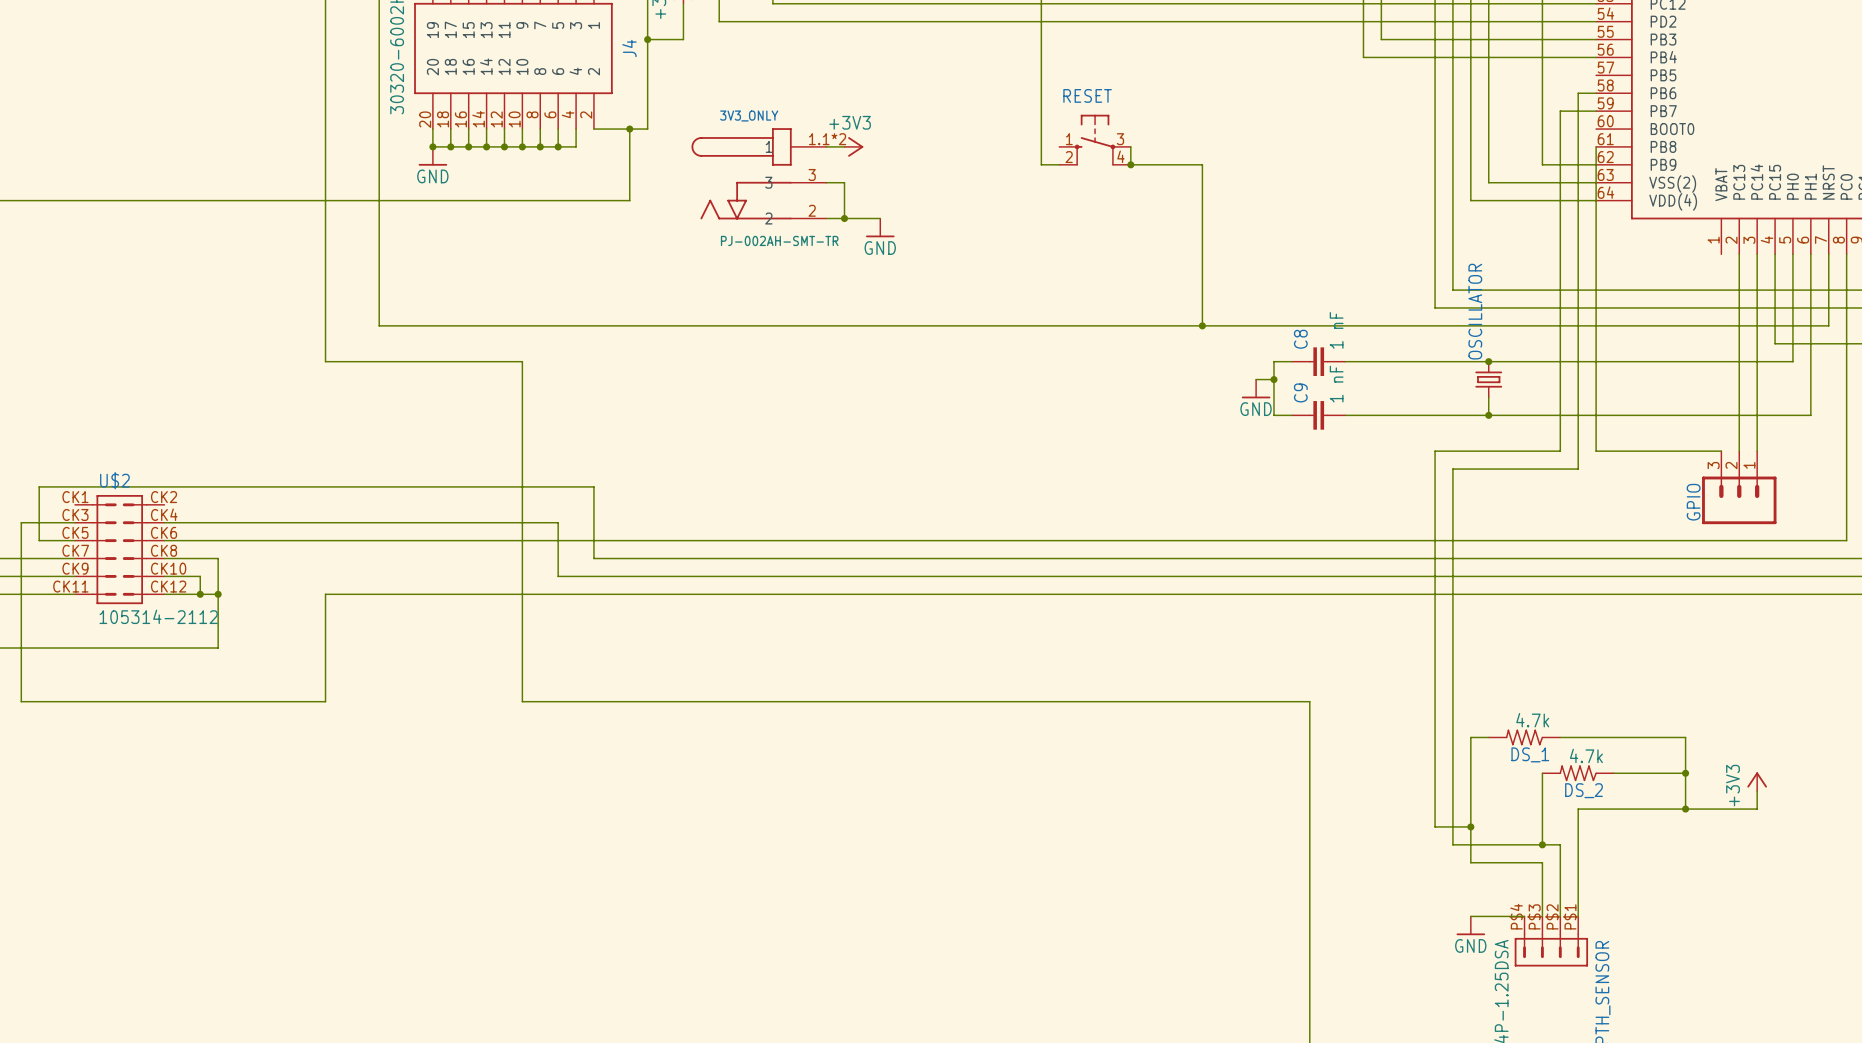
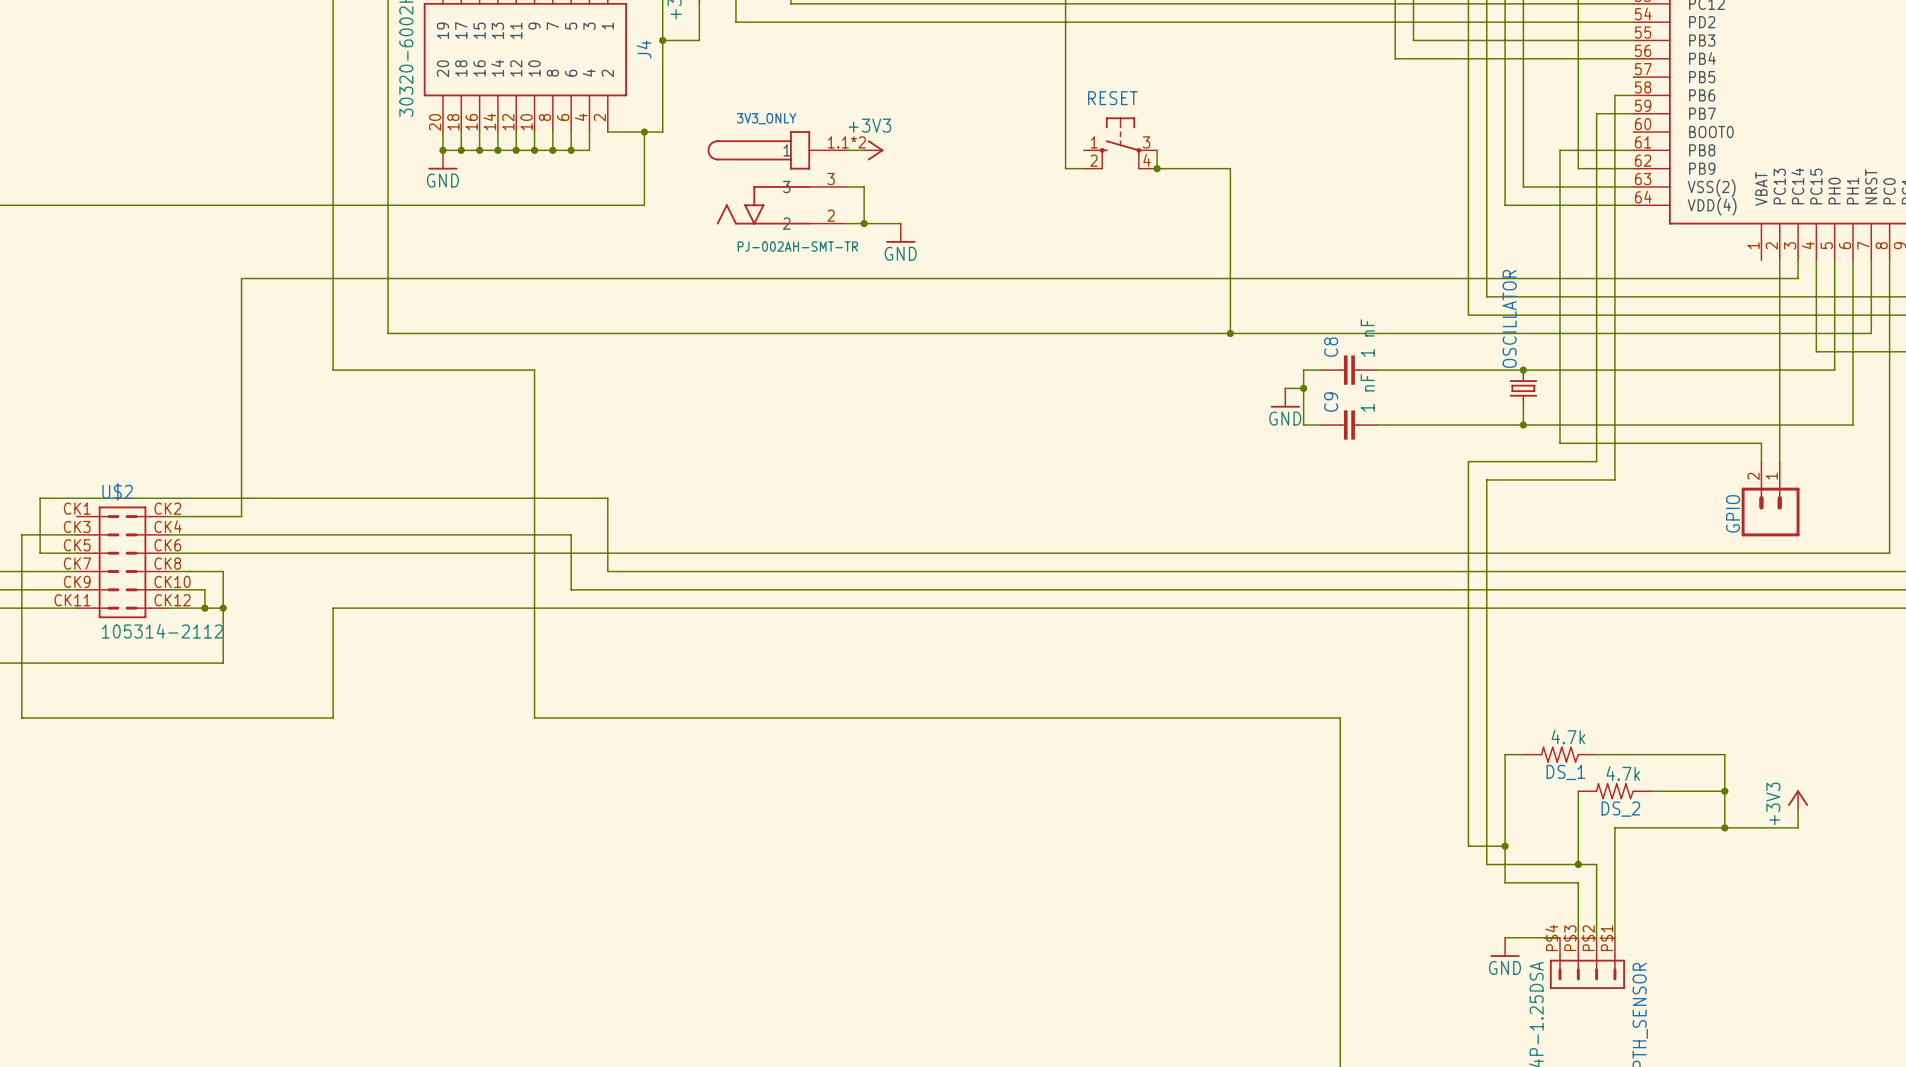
wire: (1596, 146) (1596, 451) (1721, 451) -> (1633, 150) (1560, 150) (1560, 443) (1761, 443) (1761, 461)
wire: (1757, 272) (1757, 451) -> (1798, 278) (241, 278) (241, 516) (168, 516)
GPIO: none -> (1770, 499)
GPIO: (1739, 487) -> none

